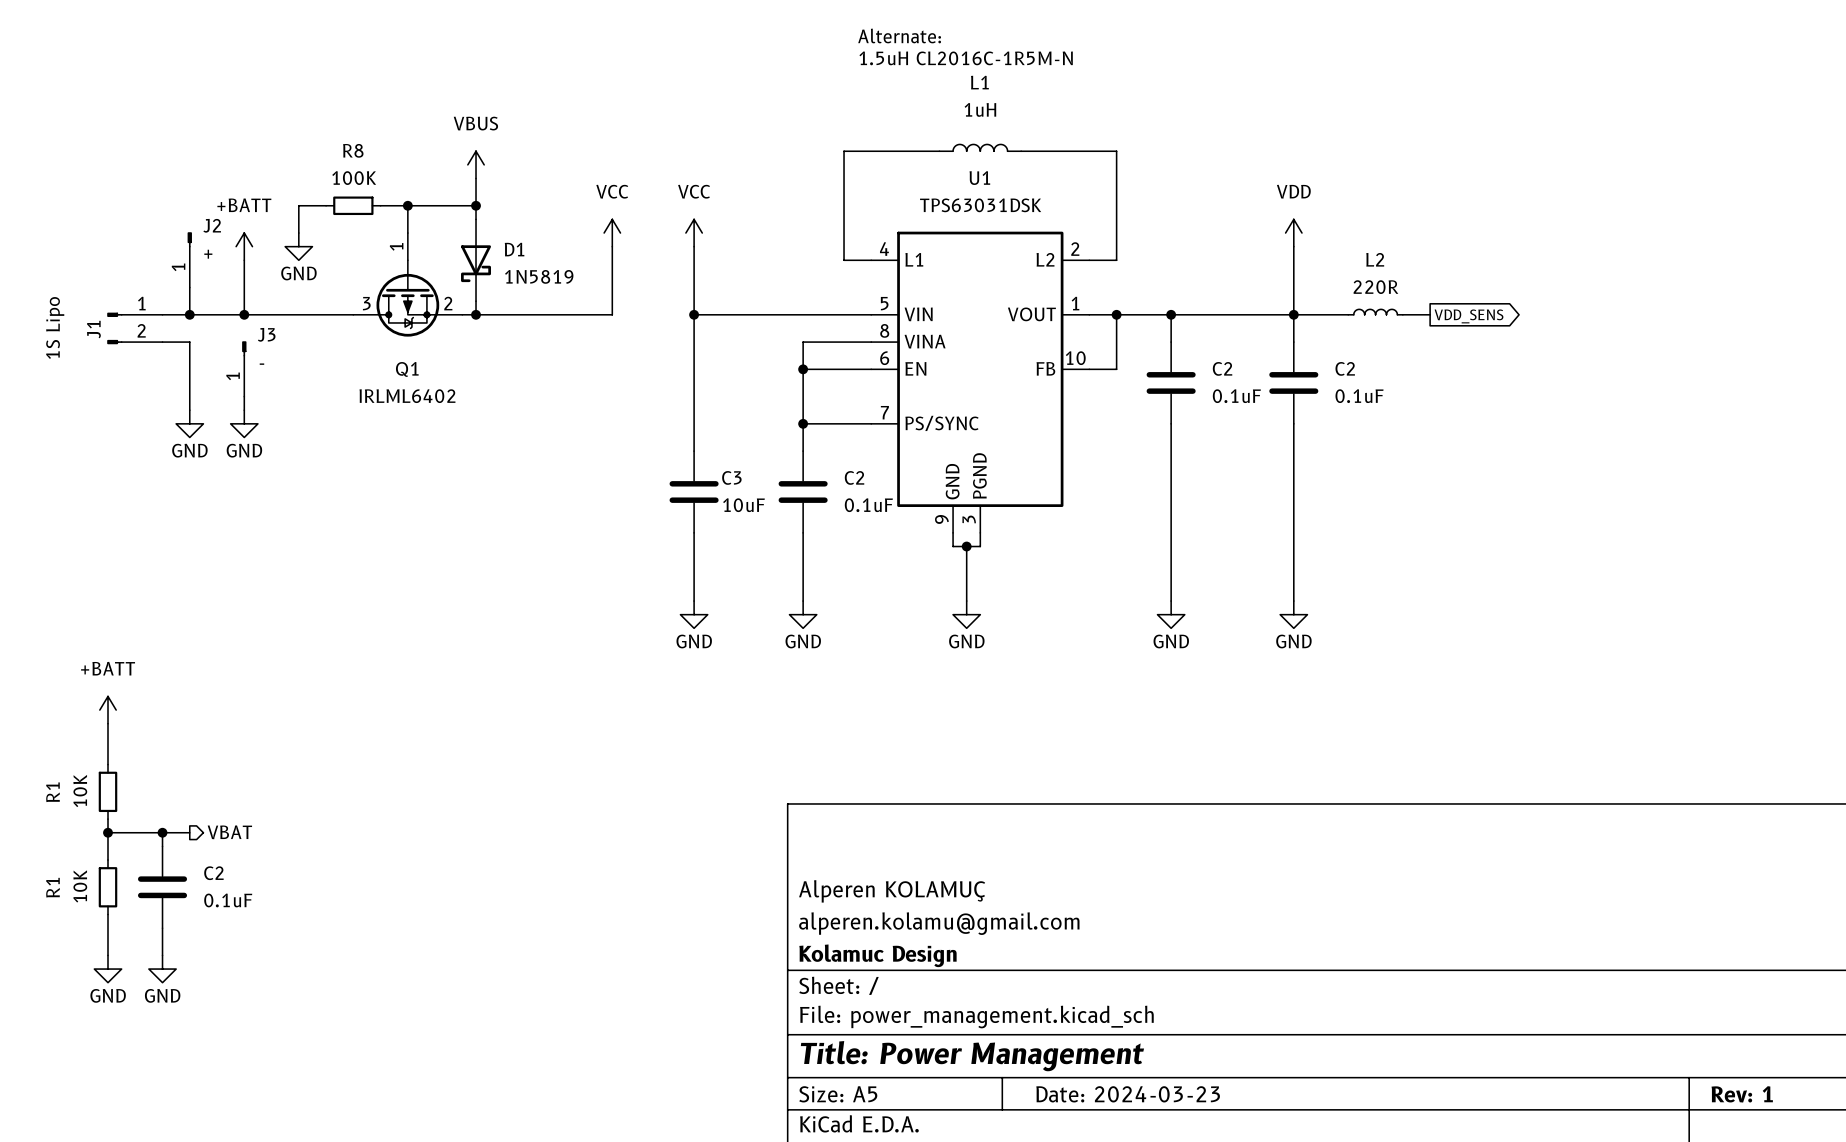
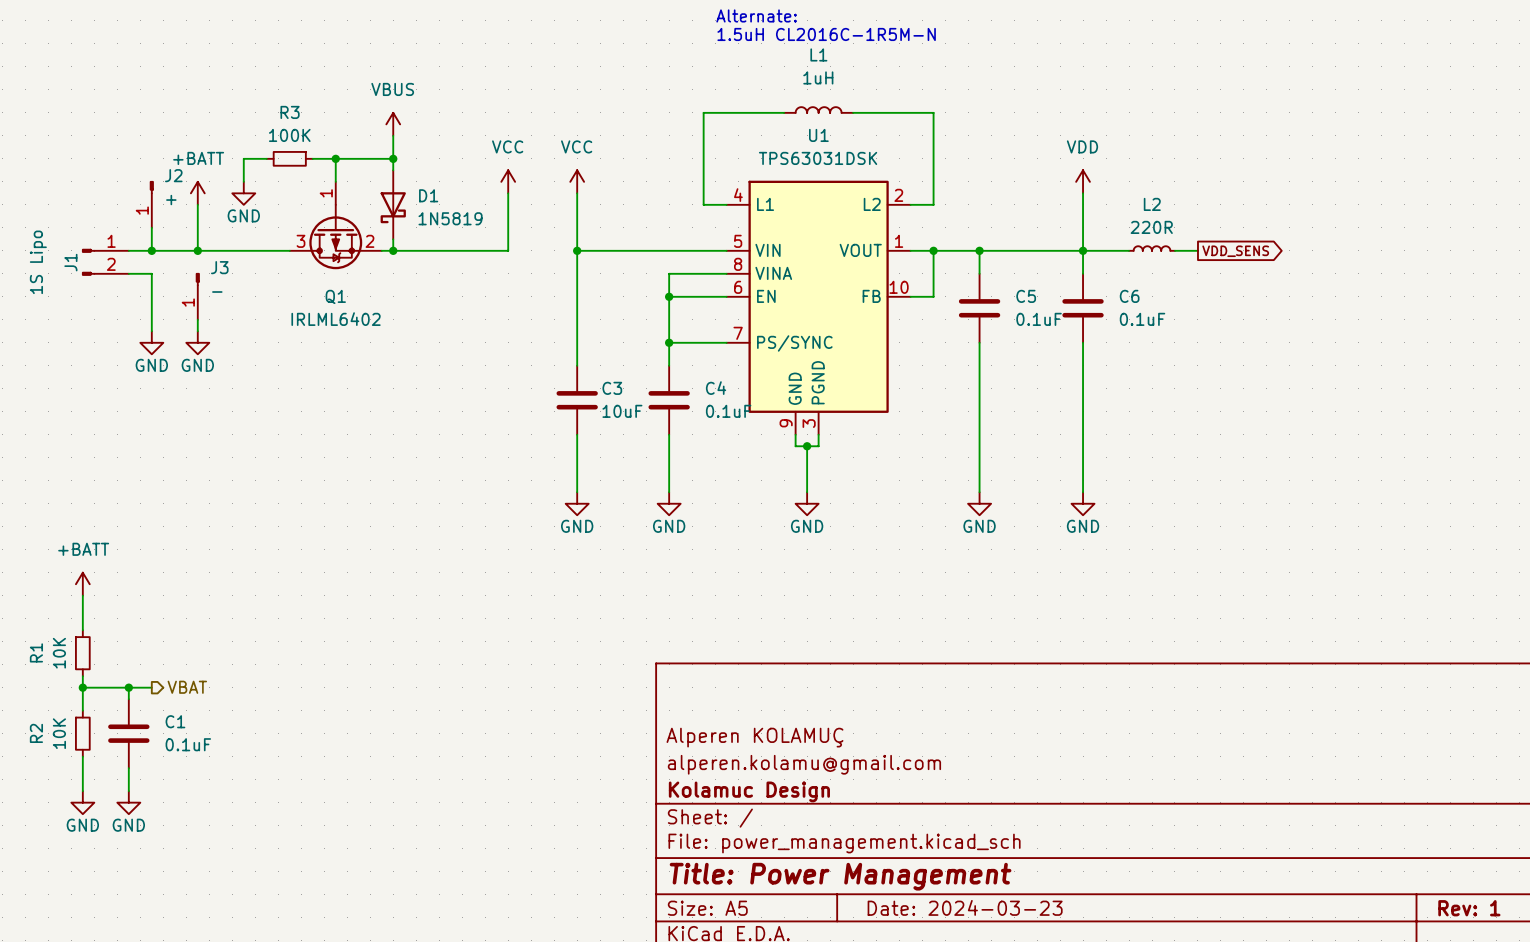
R8 name: R8 (353, 150) -> R3 (290, 112)
C2 name: C2 (1222, 368) -> C5 (1026, 296)
C2 name: C2 (1345, 368) -> C6 (1129, 296)
C2 name: C2 (854, 477) -> C4 (716, 388)
C2 name: C2 (213, 873) -> C1 (175, 721)
R1 name: R1 (52, 887) -> R2 (36, 733)

